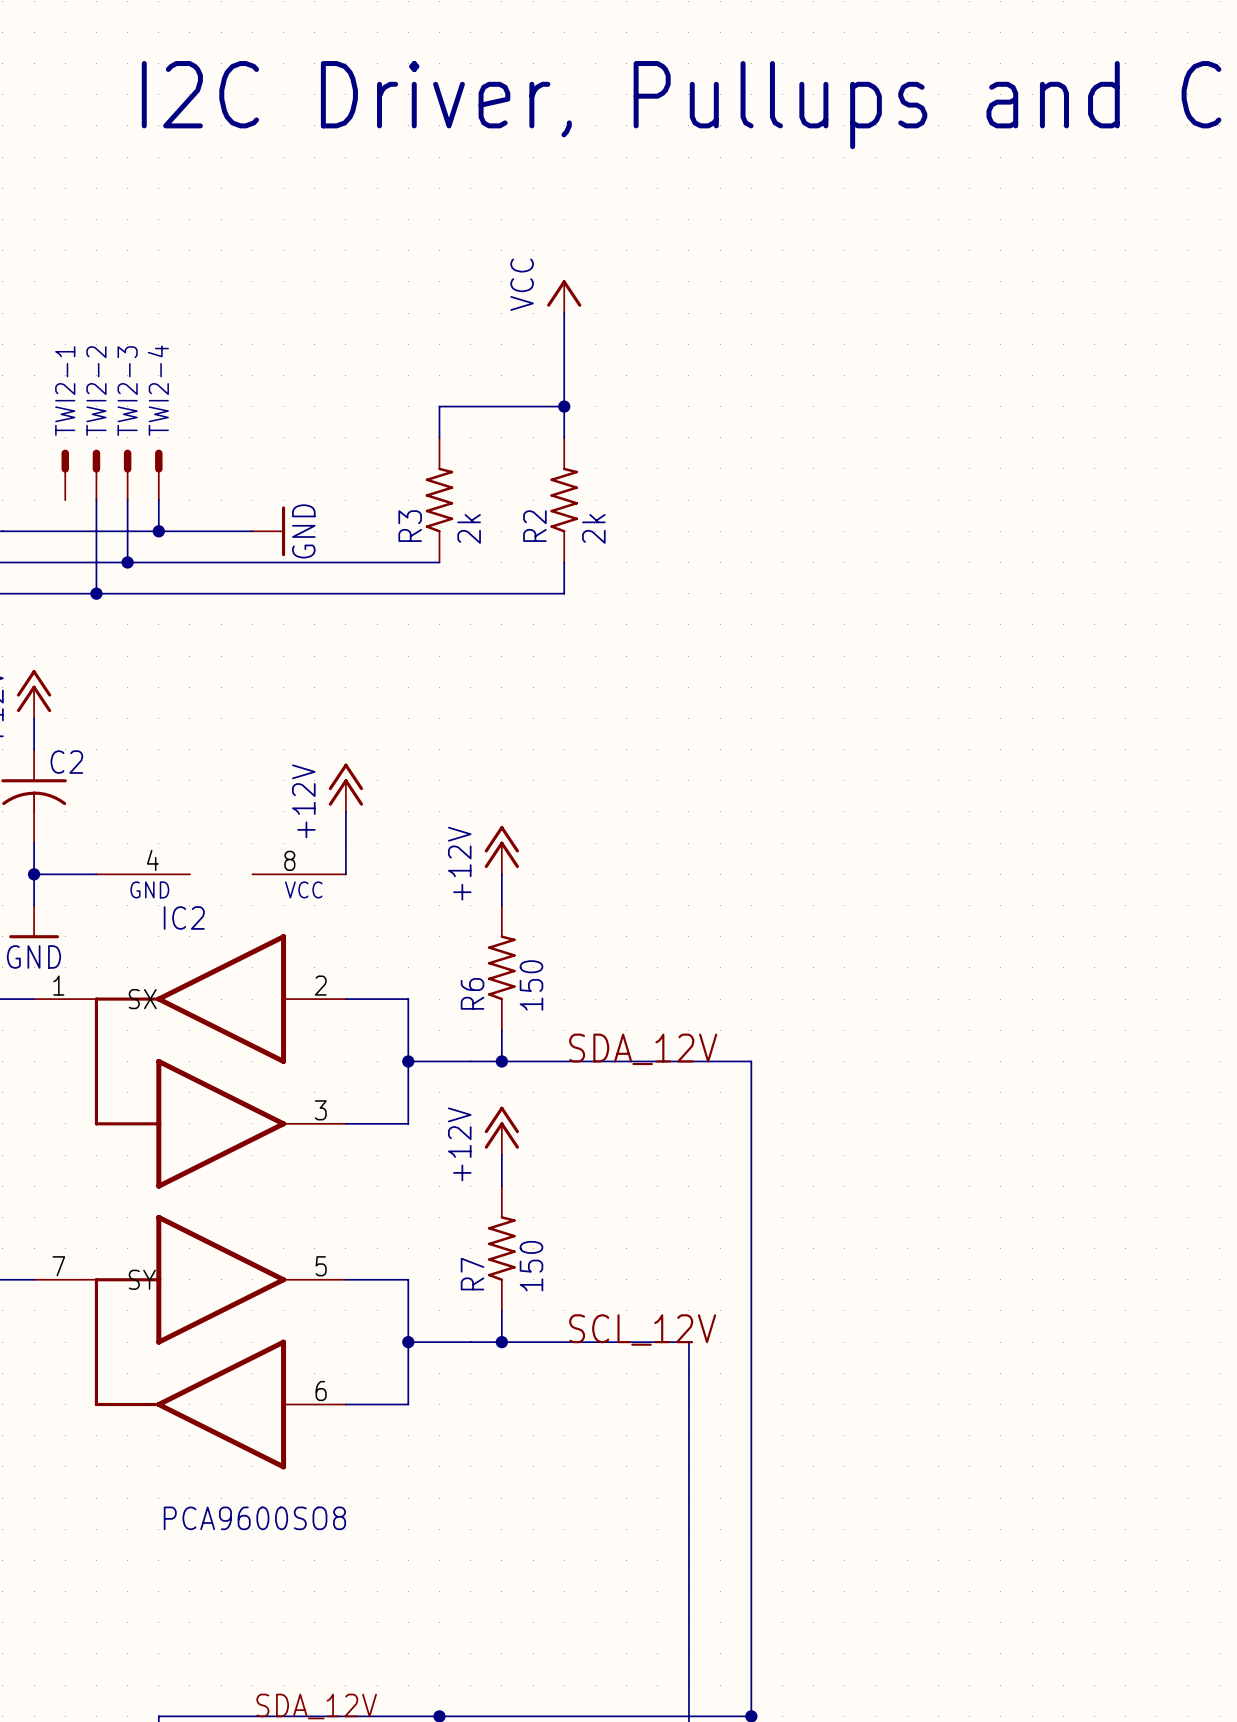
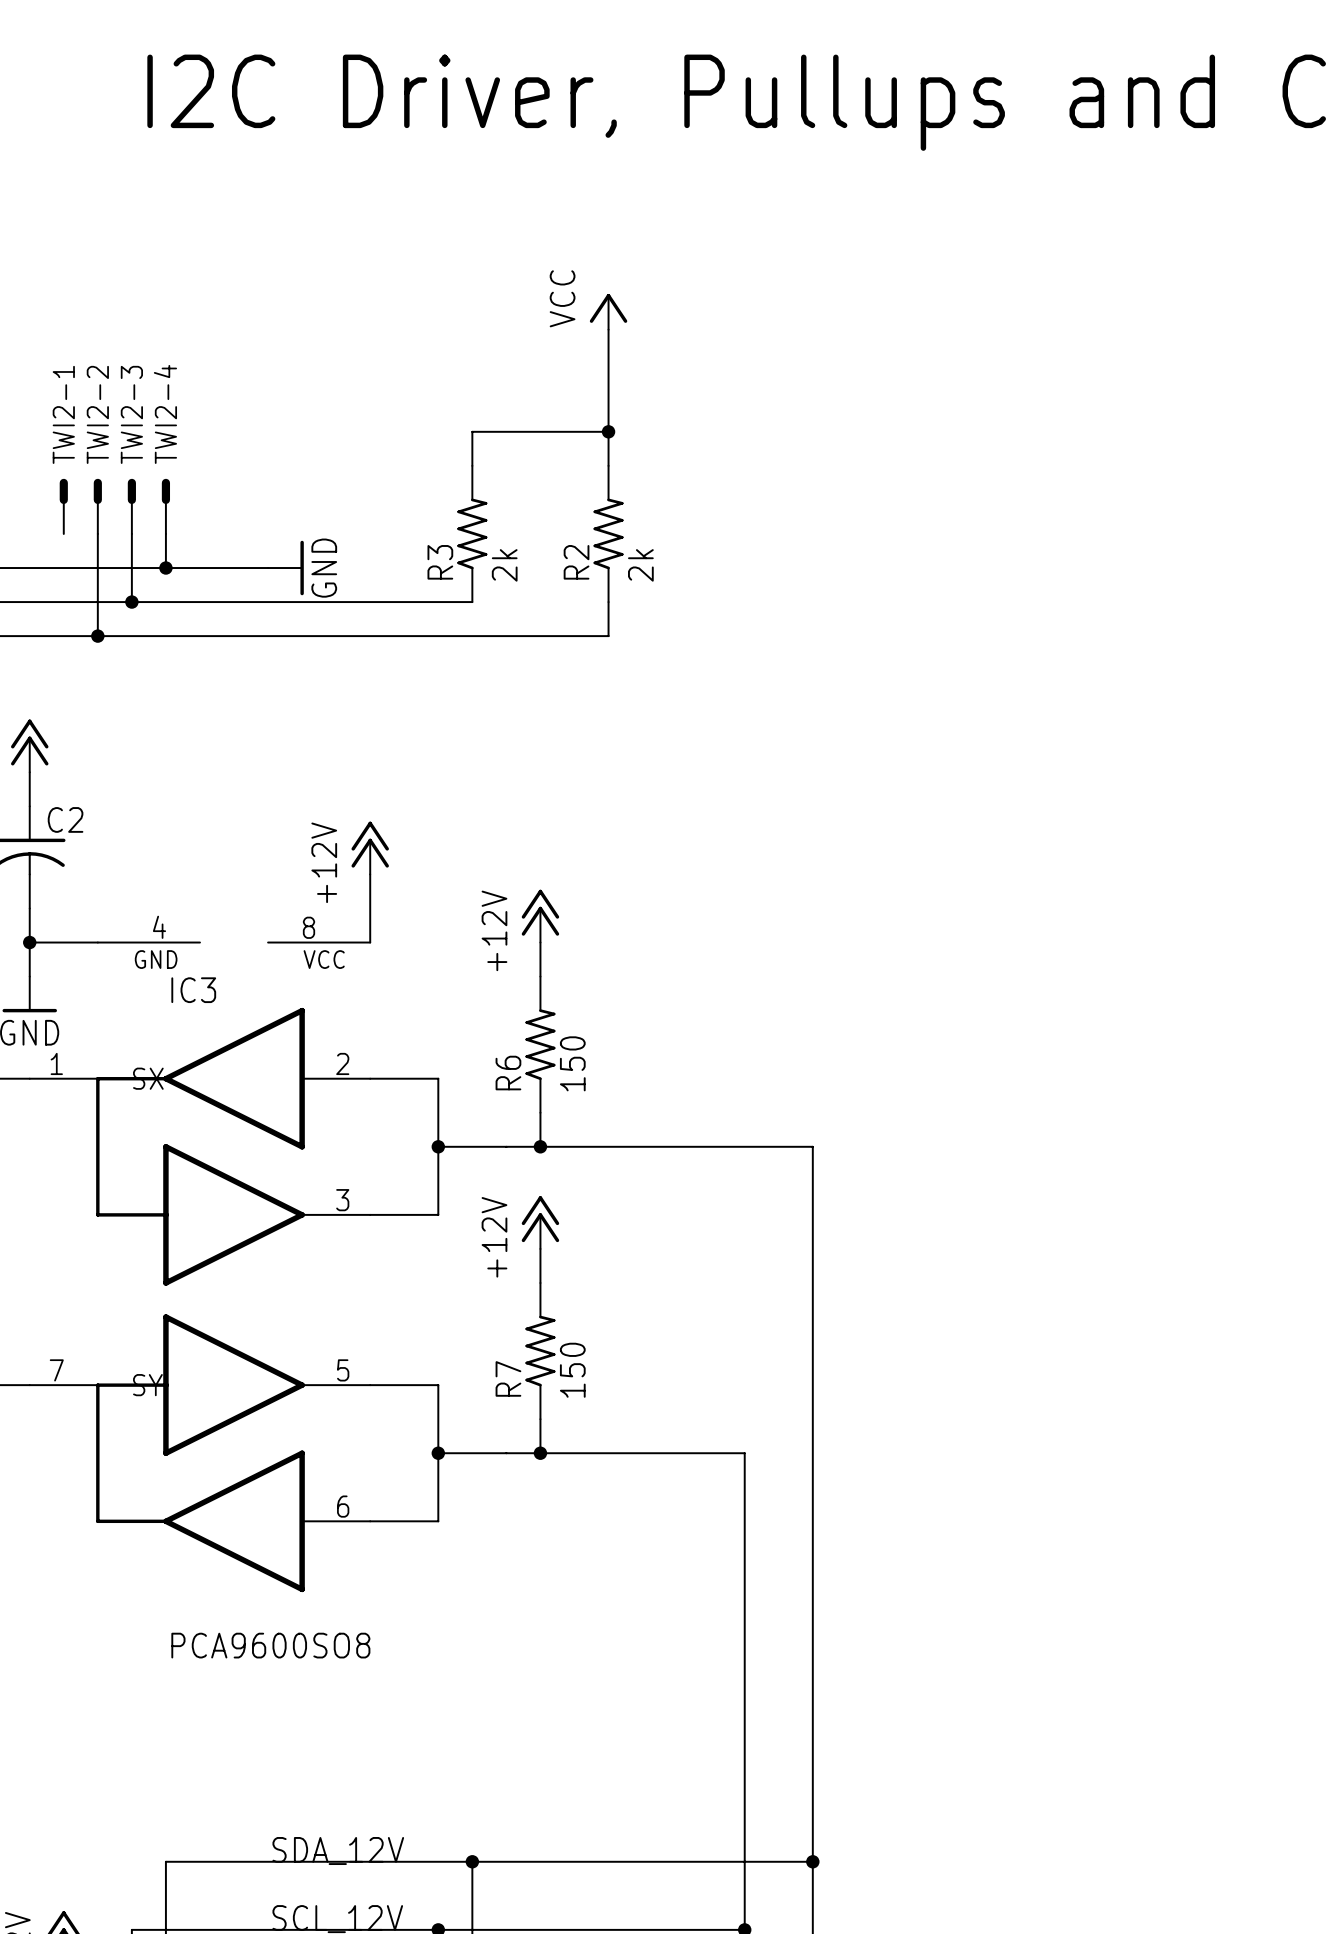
IC2 name: IC2 (184, 918) -> IC3 (193, 990)
label: SDA_12V (643, 1049) -> none
label: SCL_12V (642, 1330) -> none

